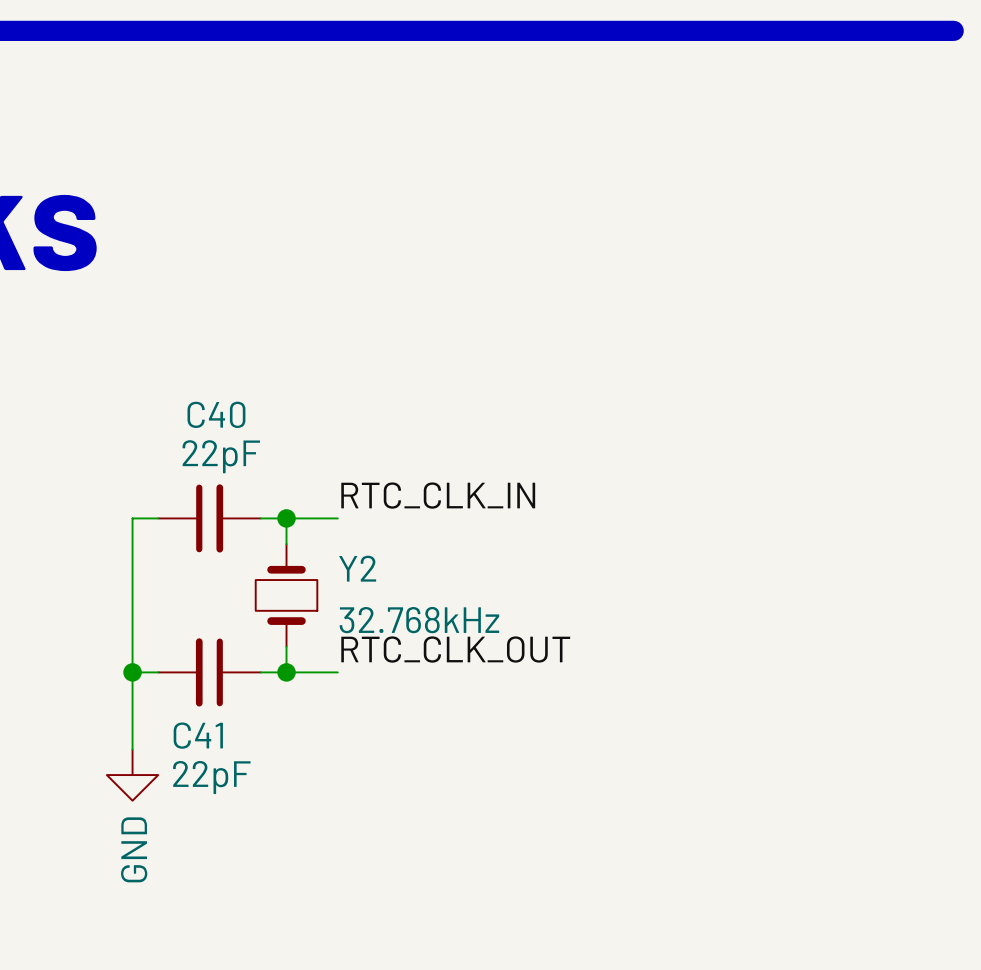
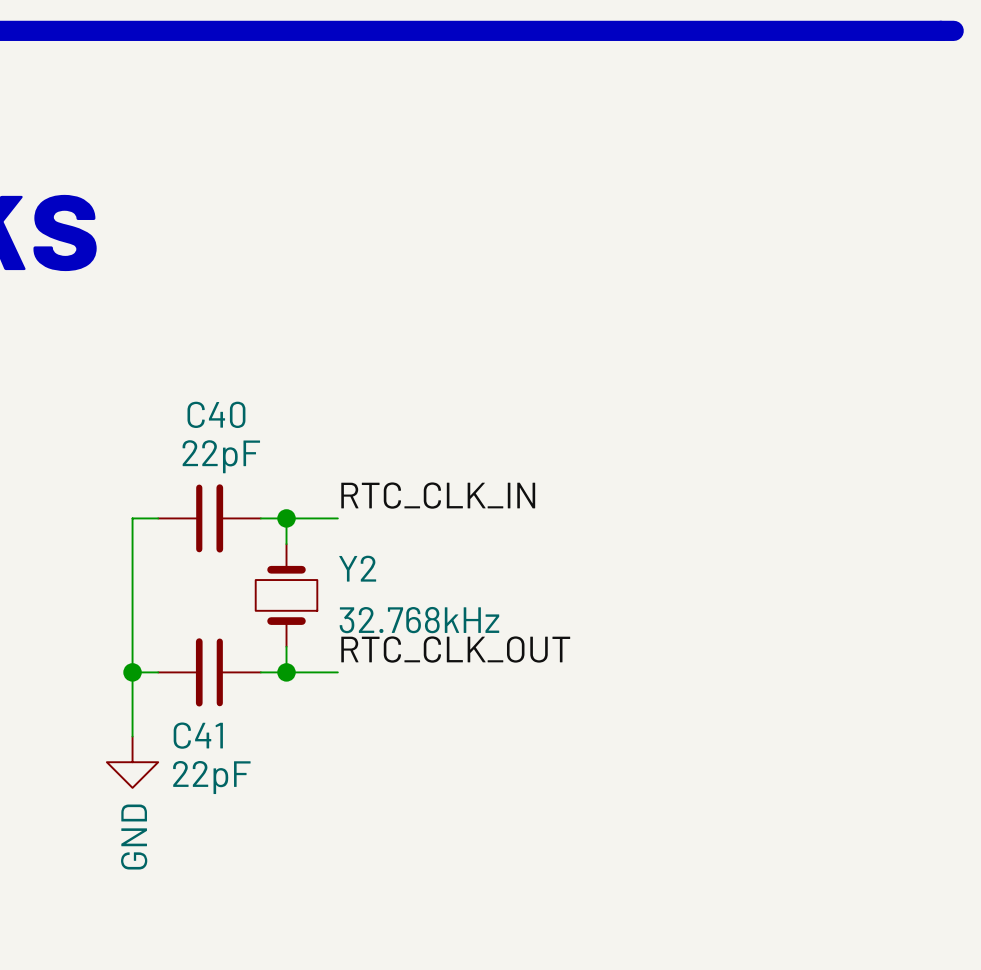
power symbol position: GND (132, 775) -> GND (132, 762)

